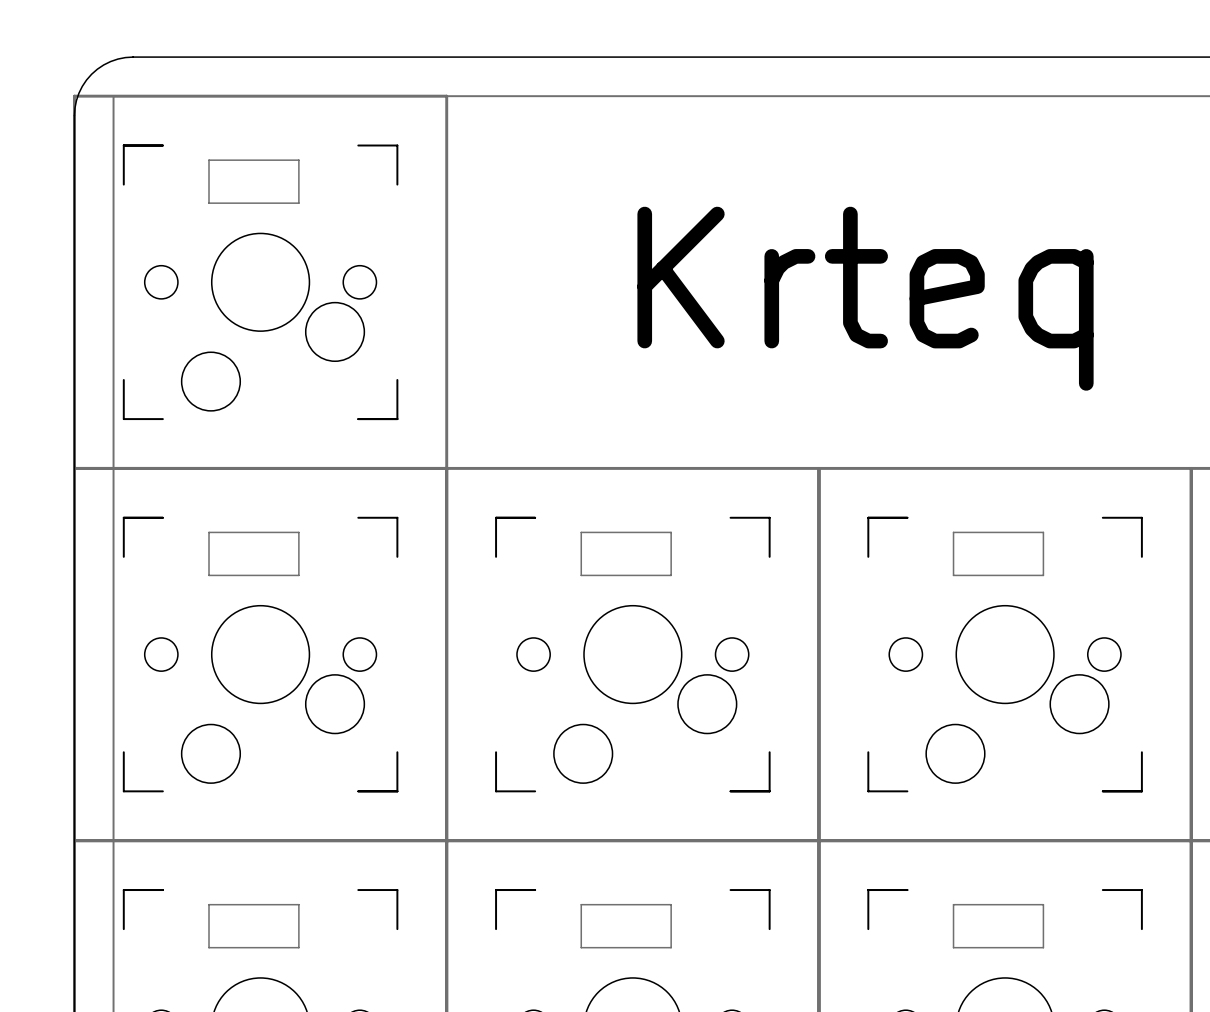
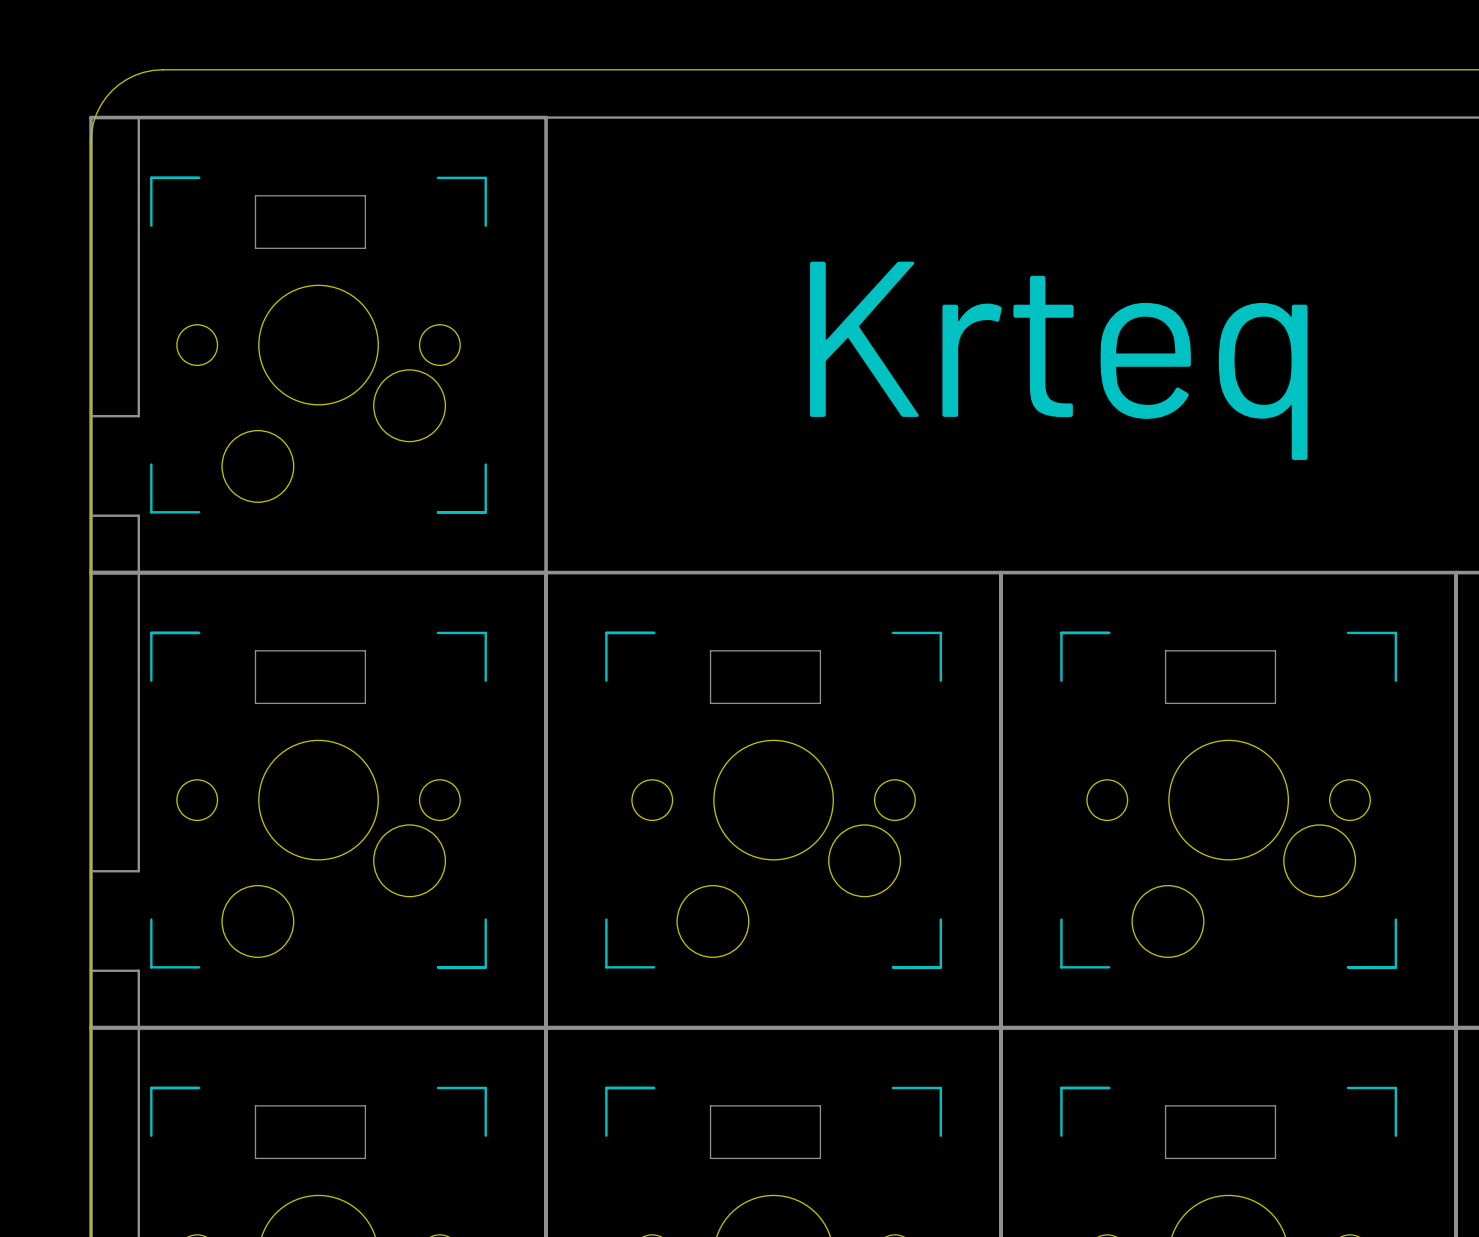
line: (113, 340) (113, 421) -> (138, 416) (91, 416)
line: none -> (91, 515) (138, 515)
line: (113, 712) (113, 794) -> (138, 871) (91, 871)
line: none -> (91, 970) (138, 970)

